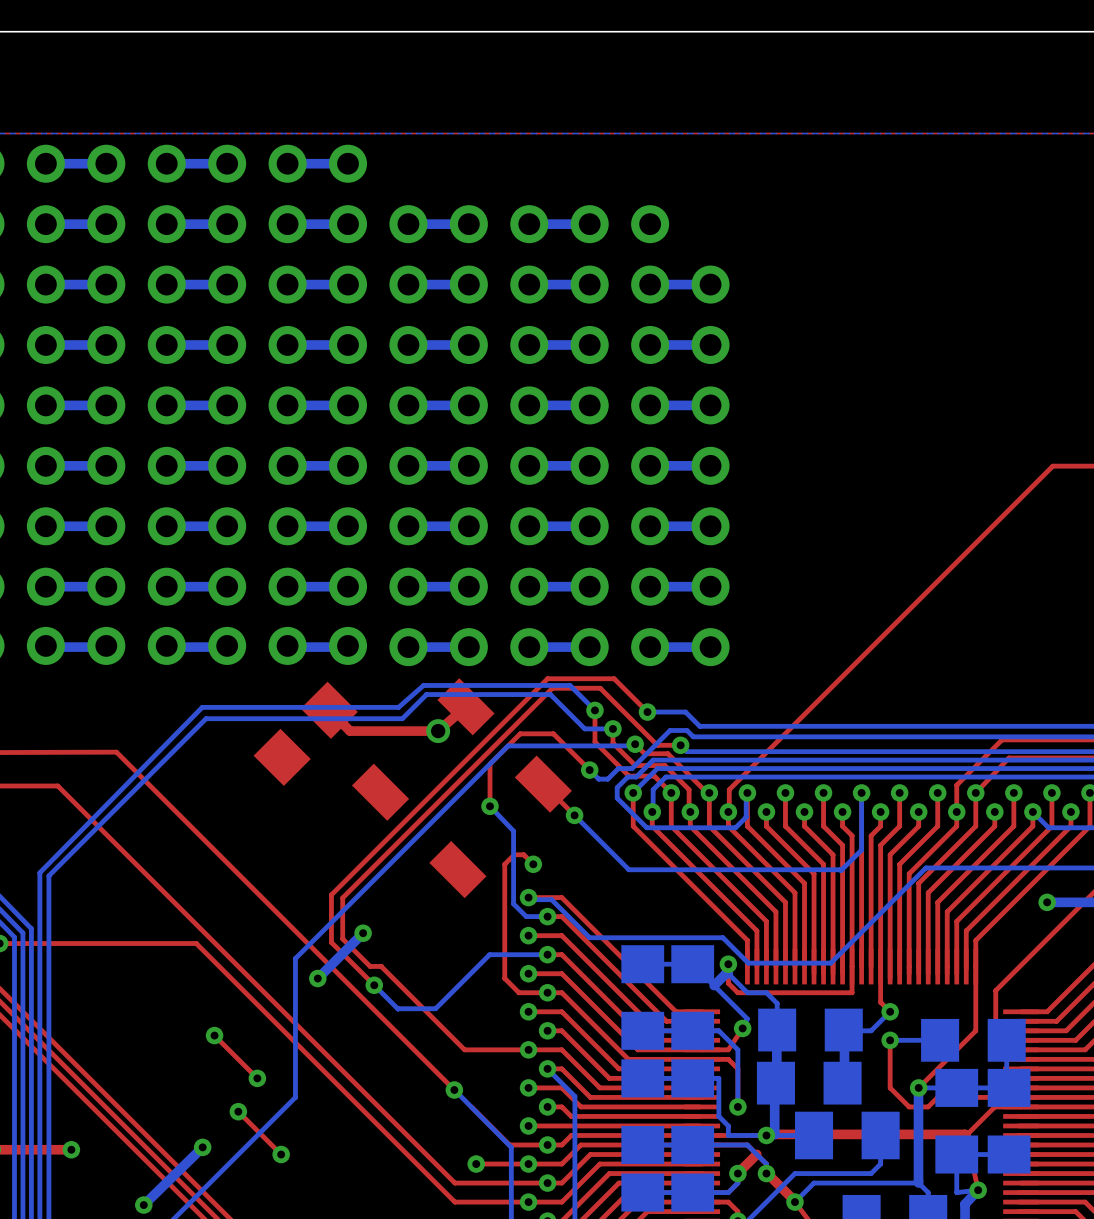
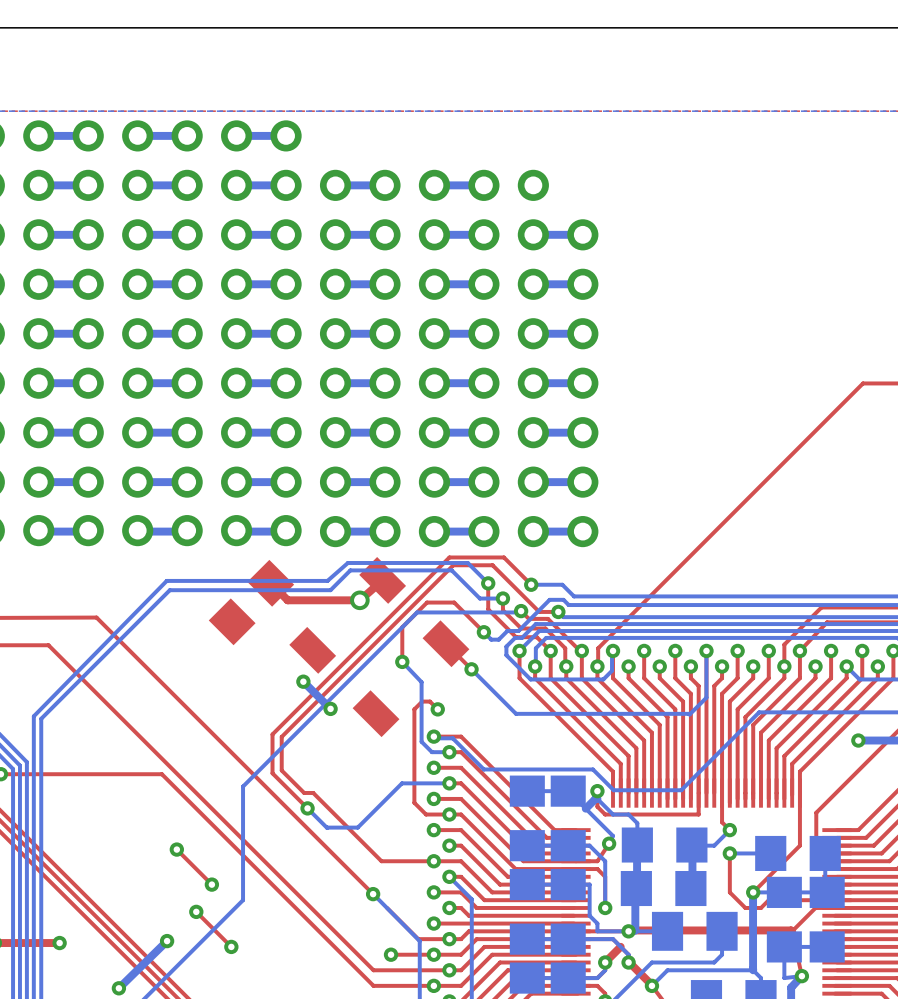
bottom track: none -> (303, 681) (330, 708)
via: none -> (303, 681)
via: none -> (330, 708)
bottom track: (363, 933) (317, 978) -> none
via: (363, 933) -> none
via: (317, 978) -> none

